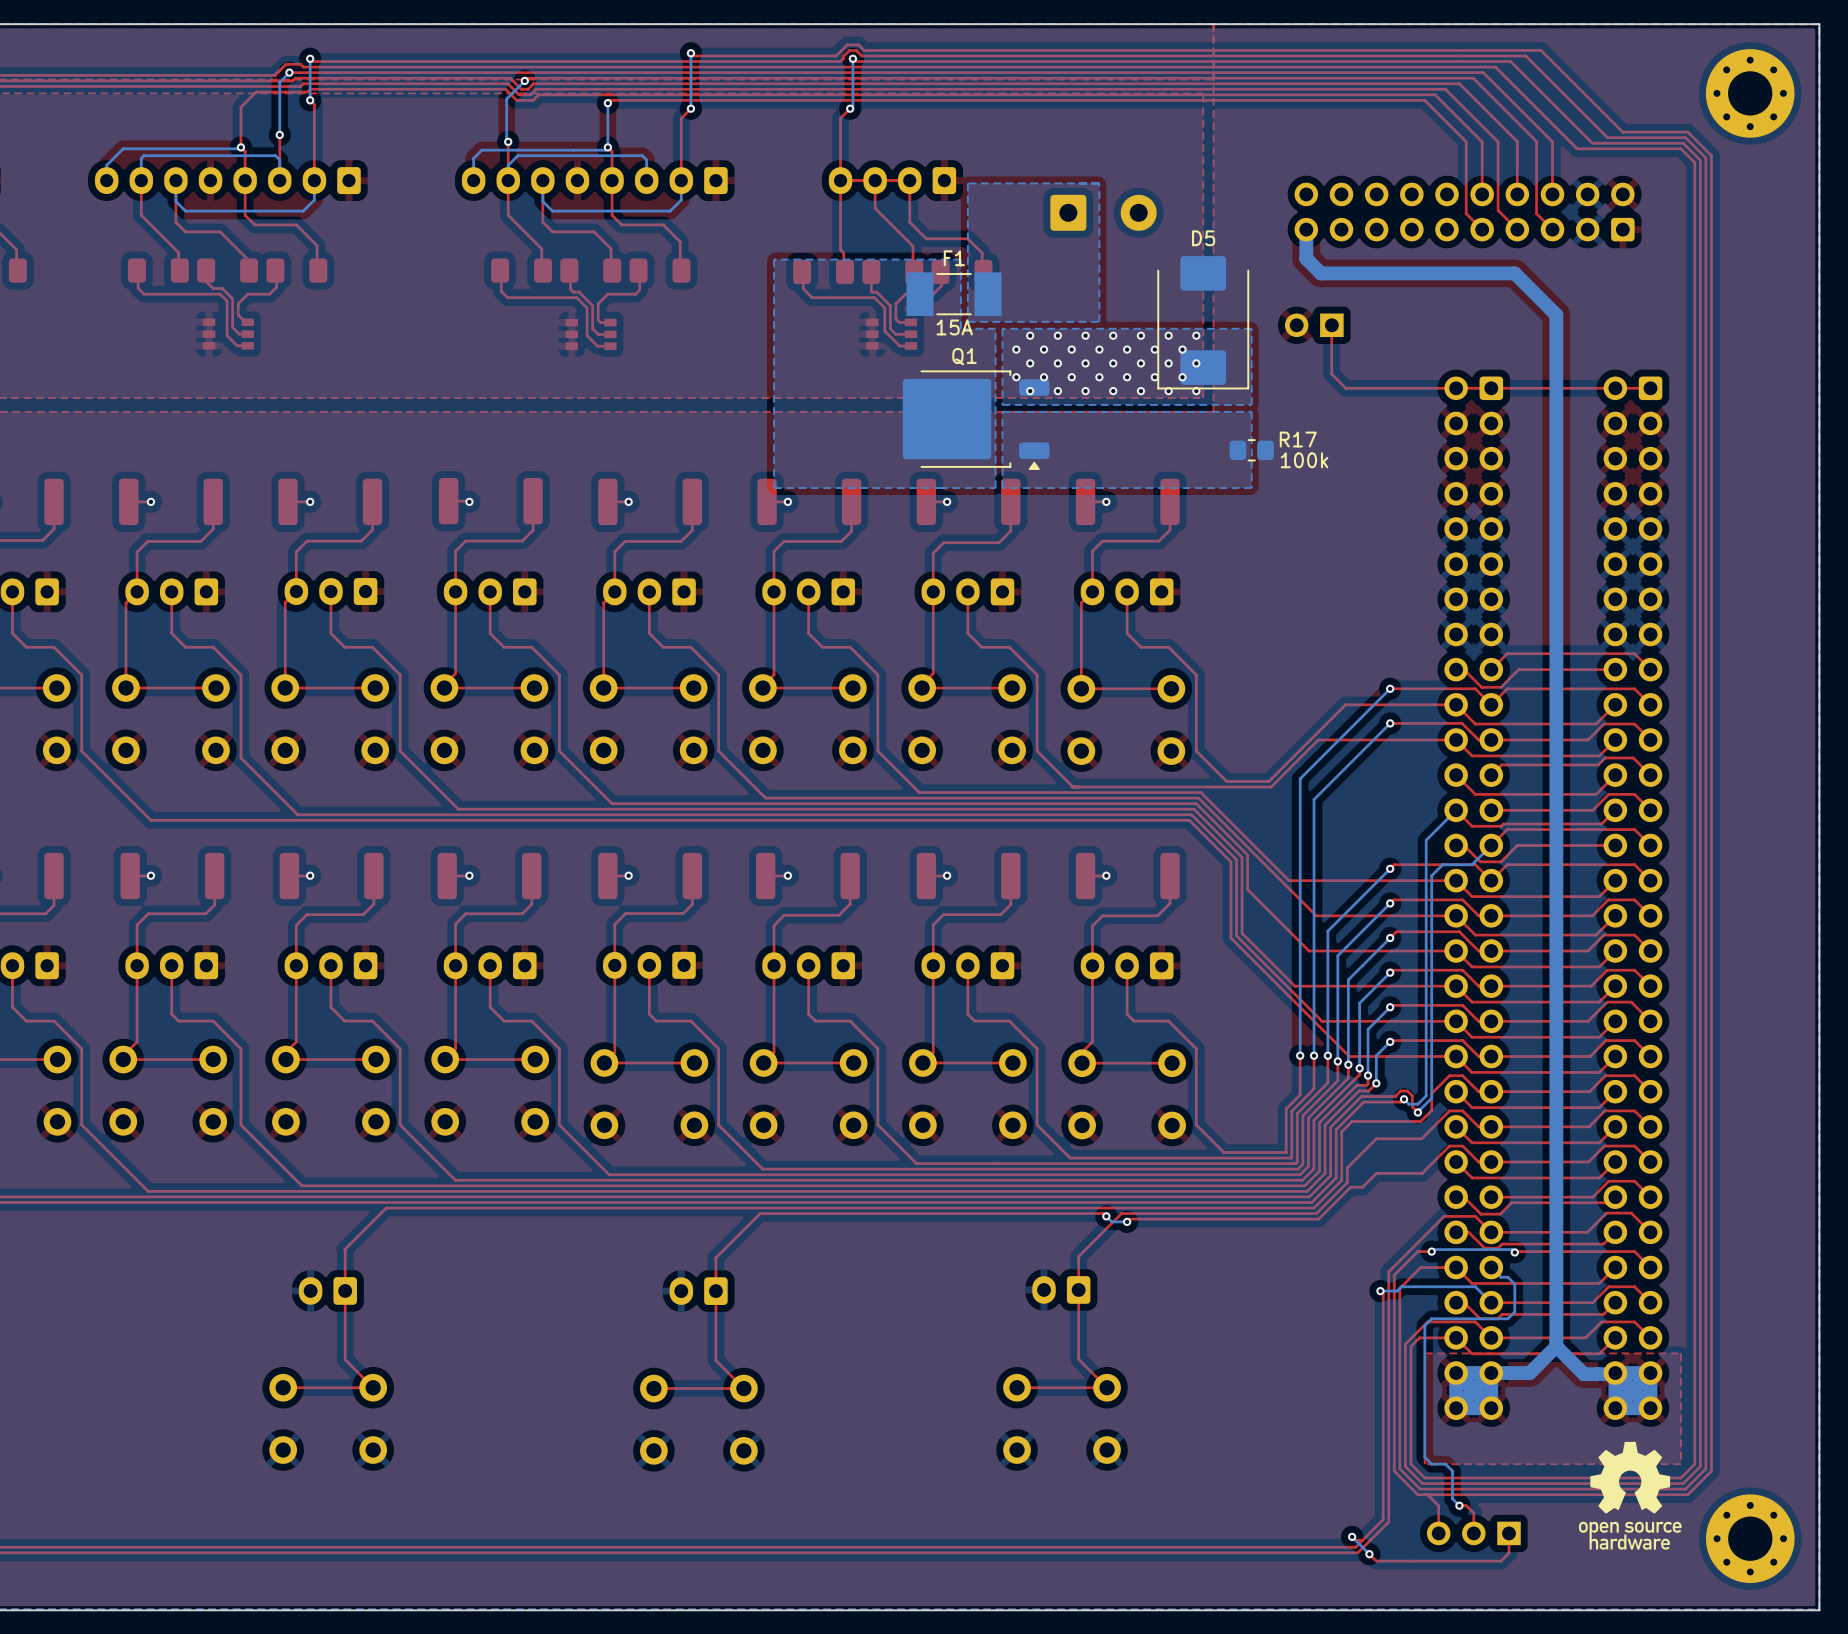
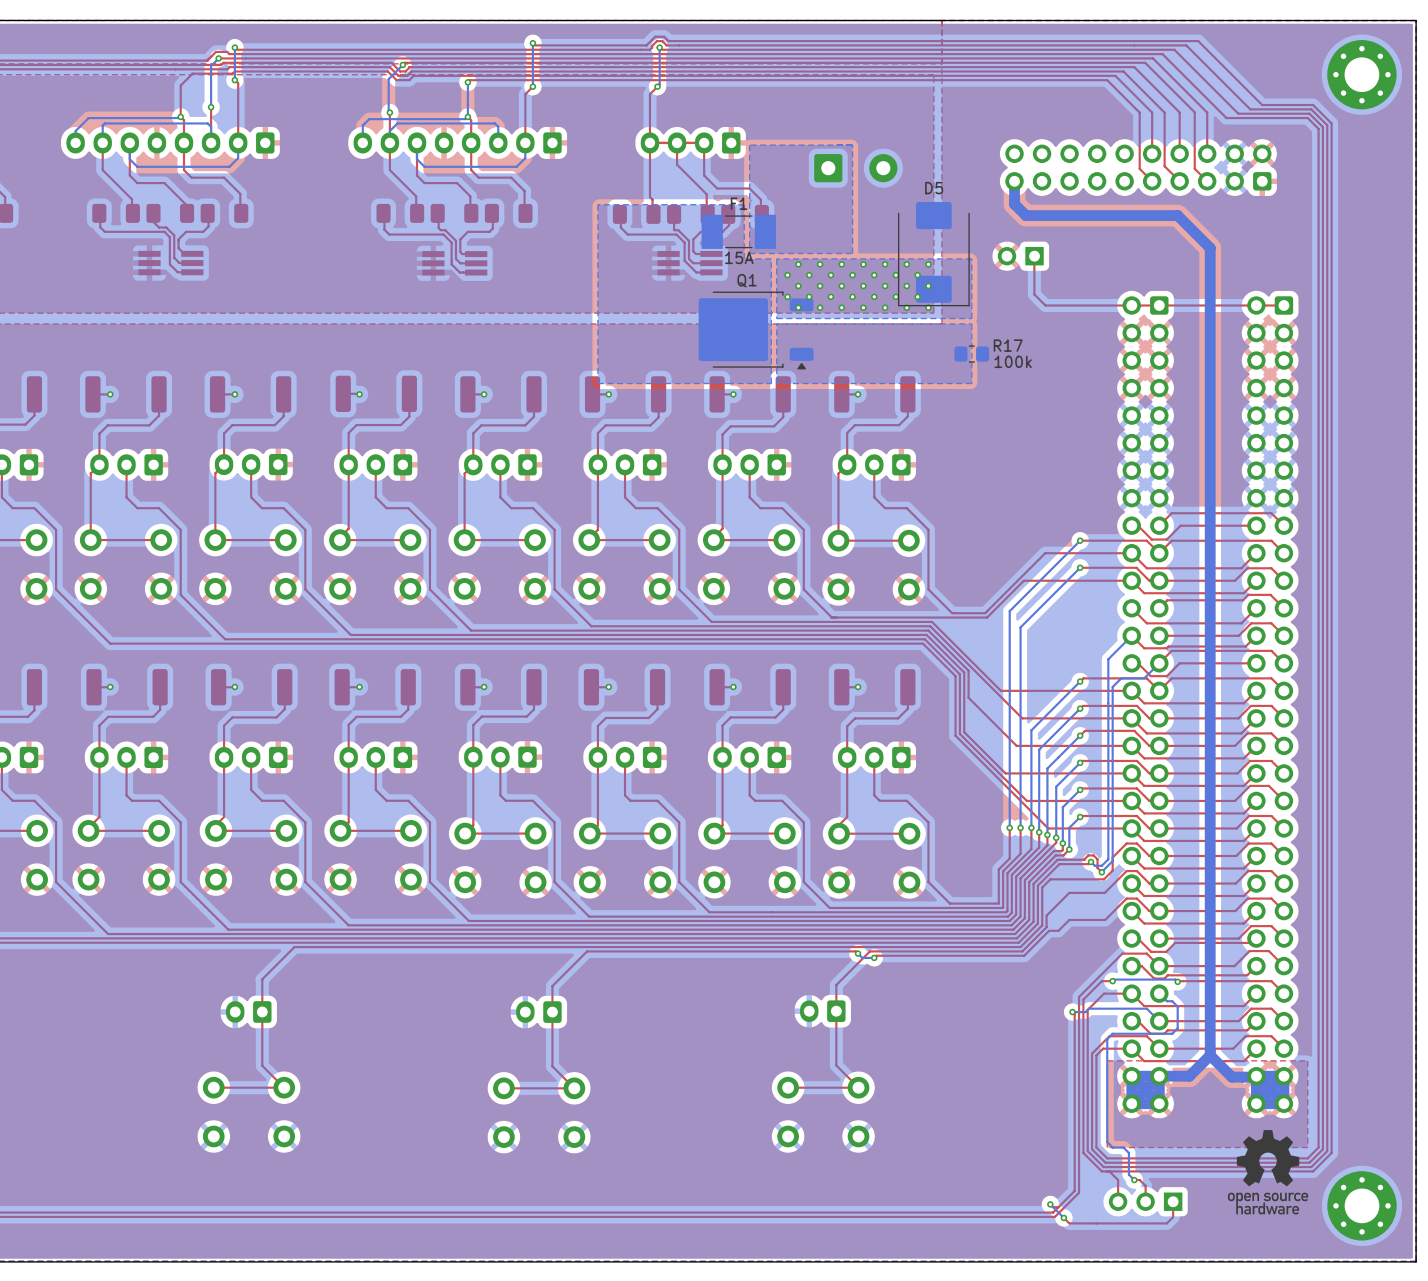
part footprint: [202, 318, 254, 350] -> [138, 250, 204, 276]
part footprint: [565, 318, 617, 350] -> [422, 251, 488, 276]
part footprint: [866, 318, 918, 350] -> [657, 250, 723, 276]

